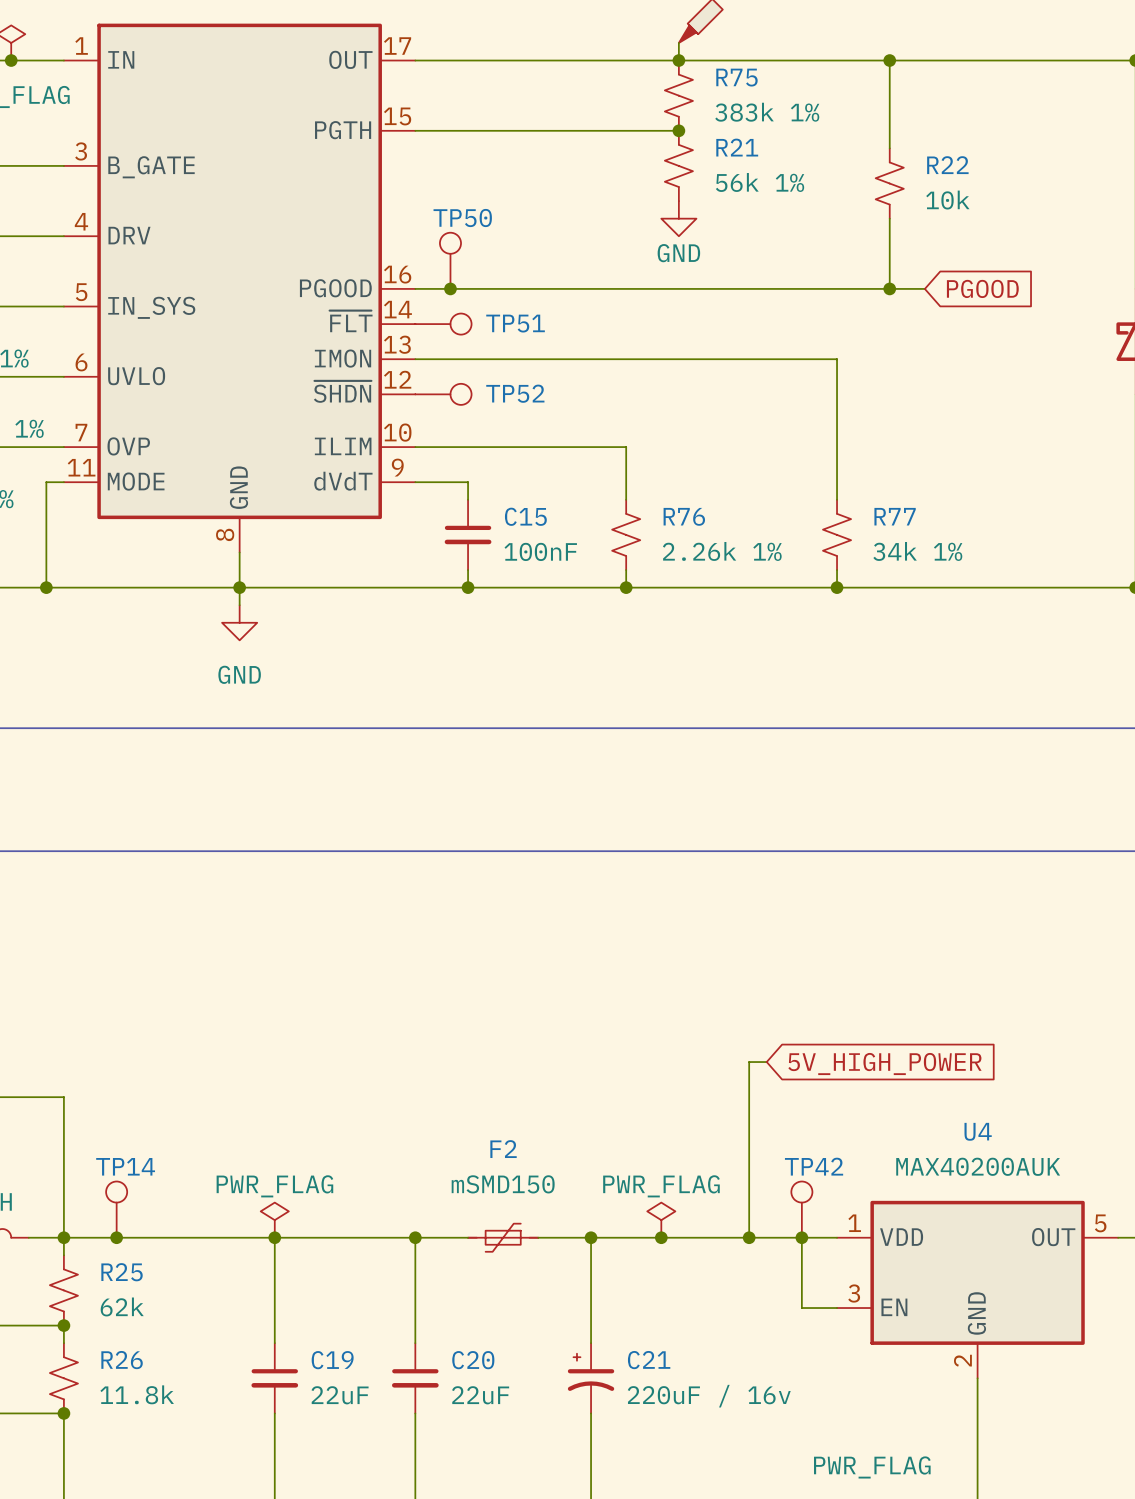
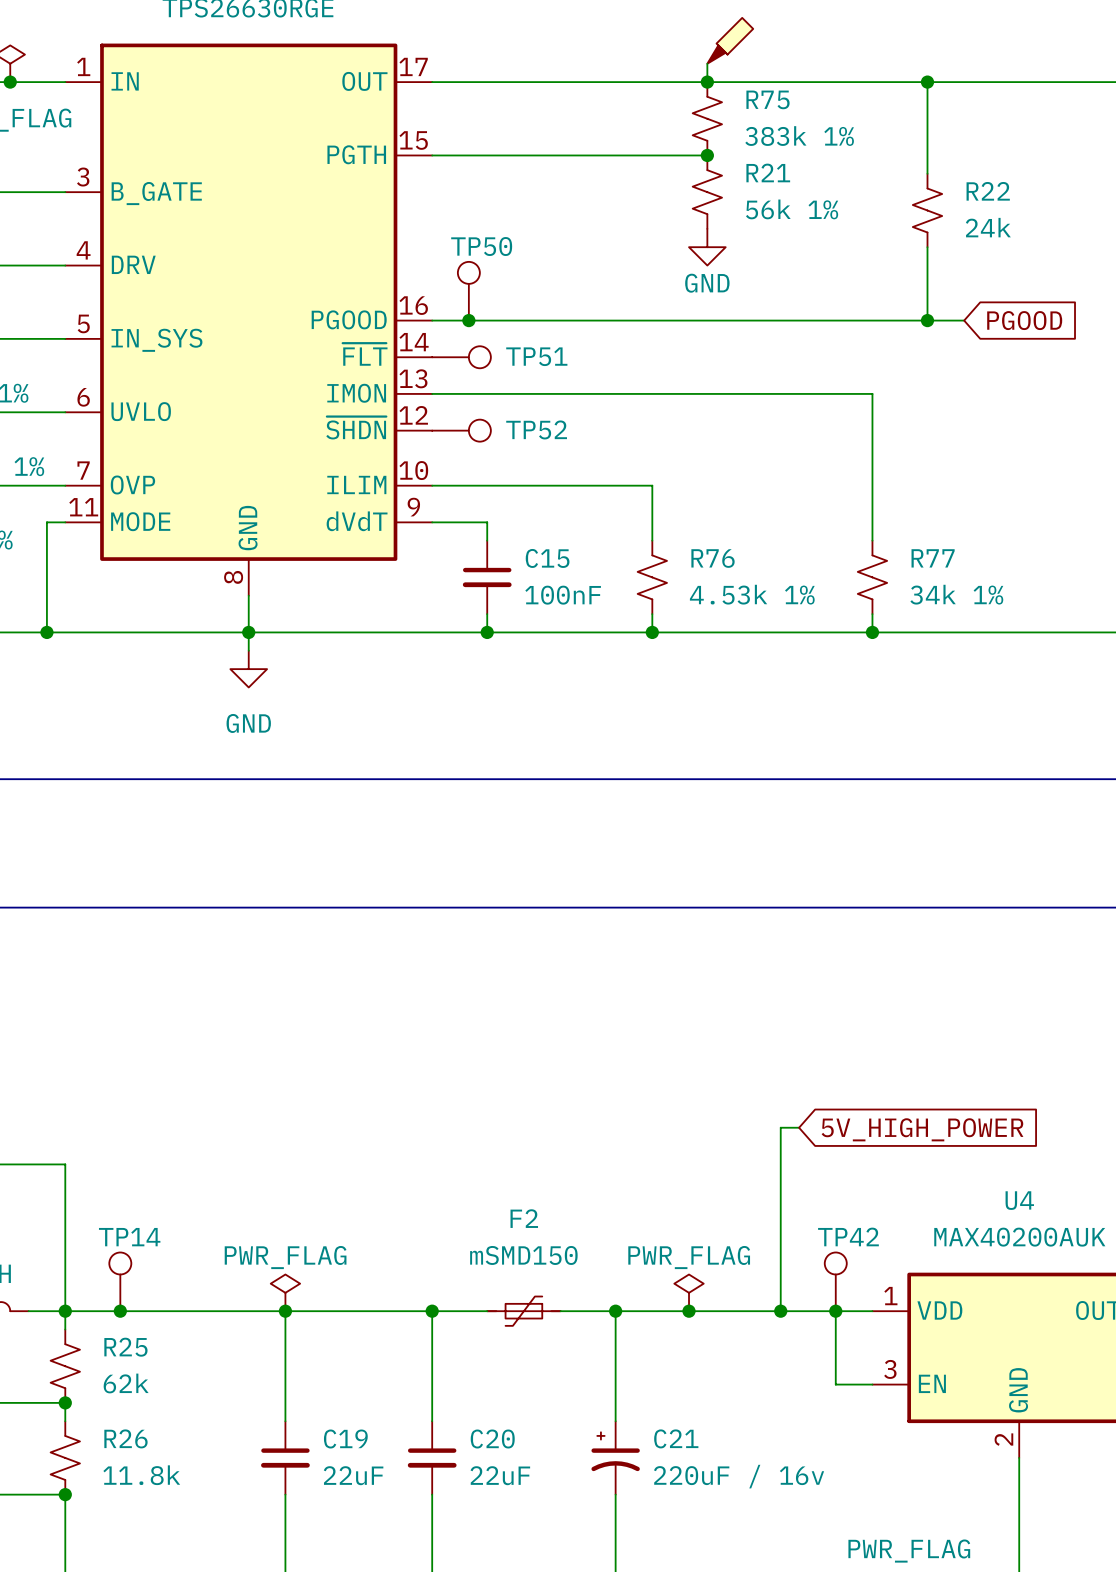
R22 value: 10k (947, 200) -> 24k (988, 227)
R76 value: 2.26k 1% (722, 551) -> 4.53k 1% (752, 594)

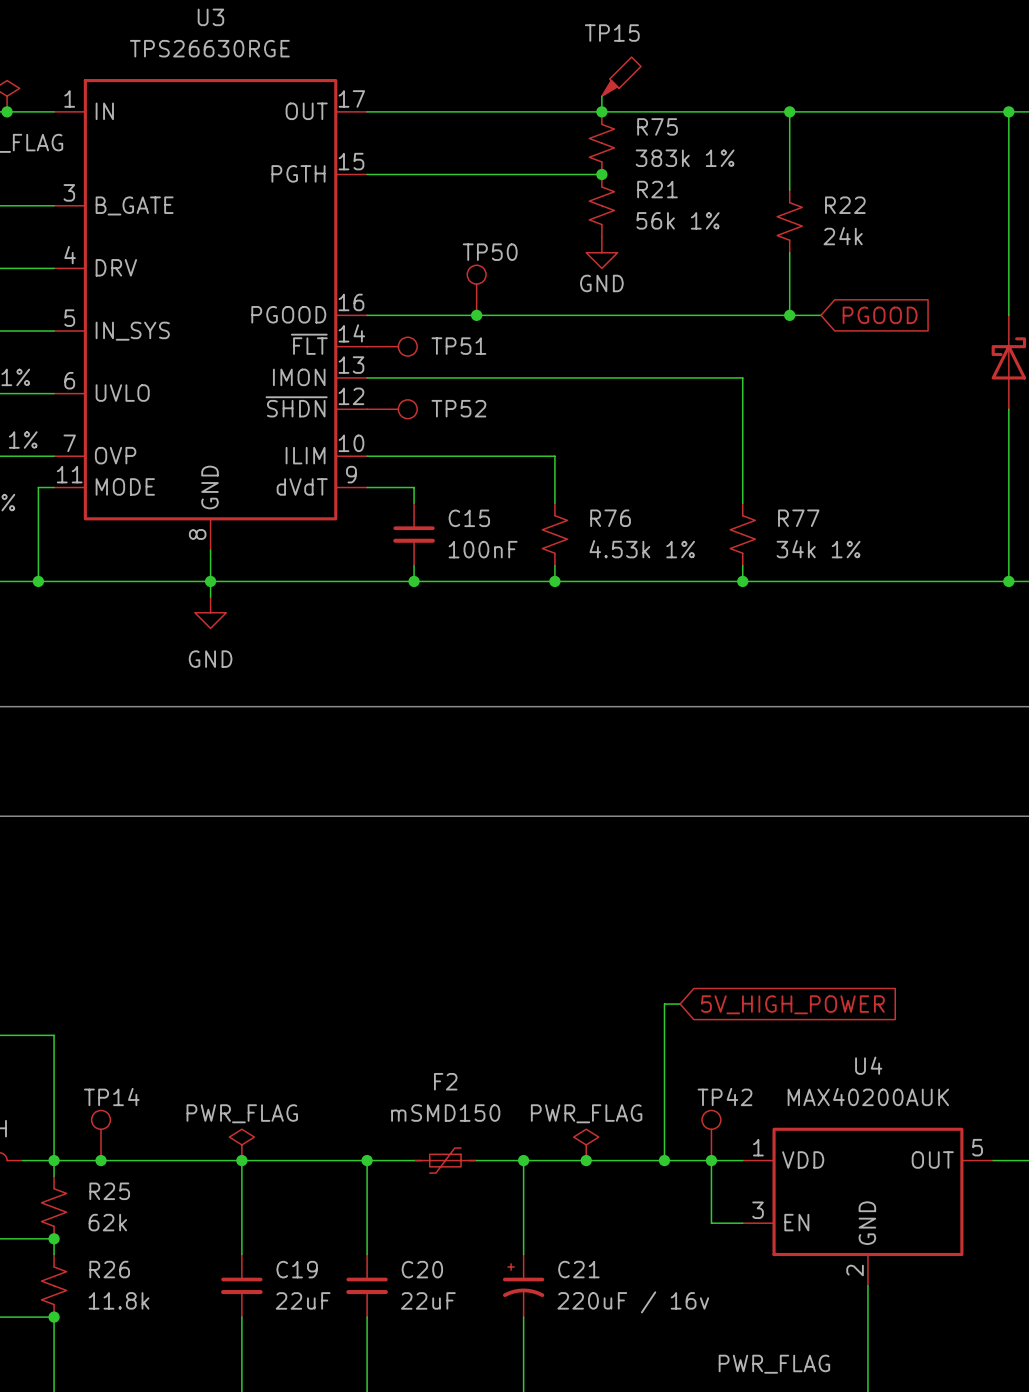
TP50 position: (468, 291) -> (476, 290)
junction: (468, 320) -> none
junction: none -> (476, 315)

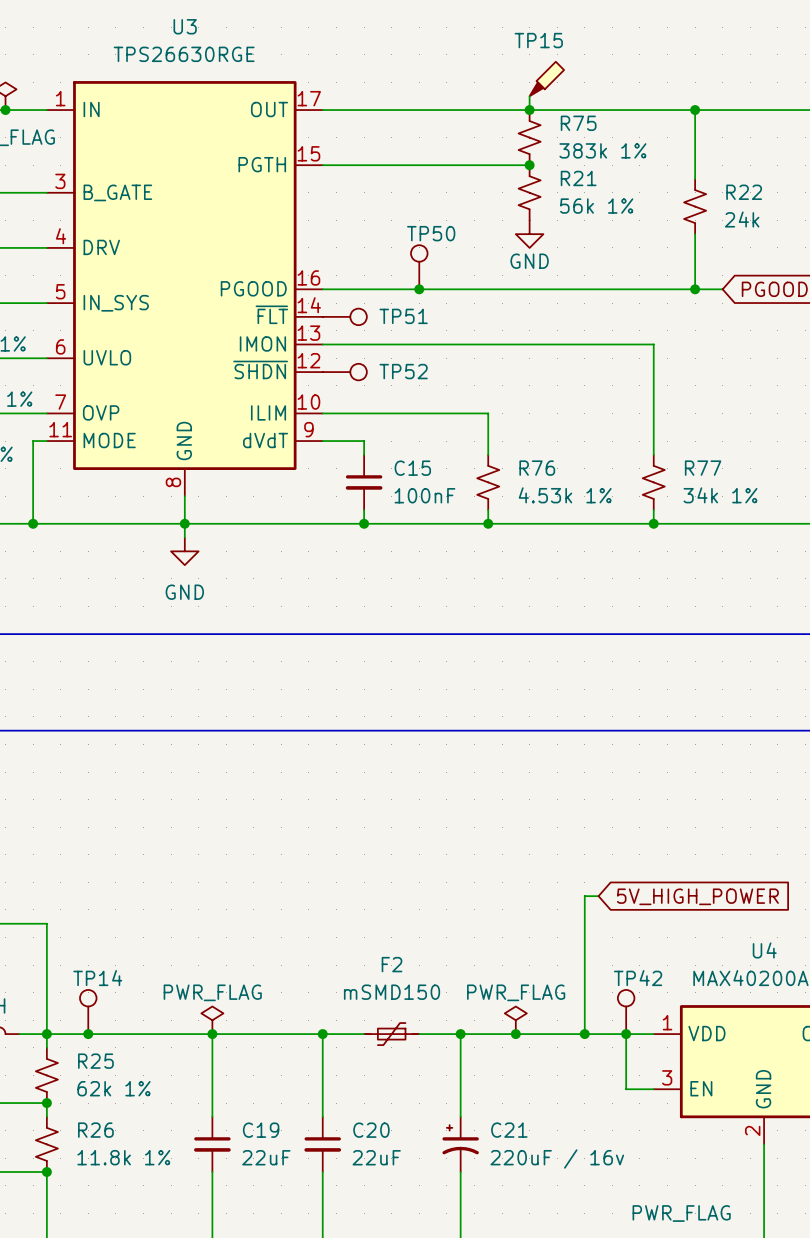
R25 value: 62k (107, 1222) -> 62k 1% (113, 1088)
R26 value: 11.8k (119, 1300) -> 11.8k 1% (123, 1157)

